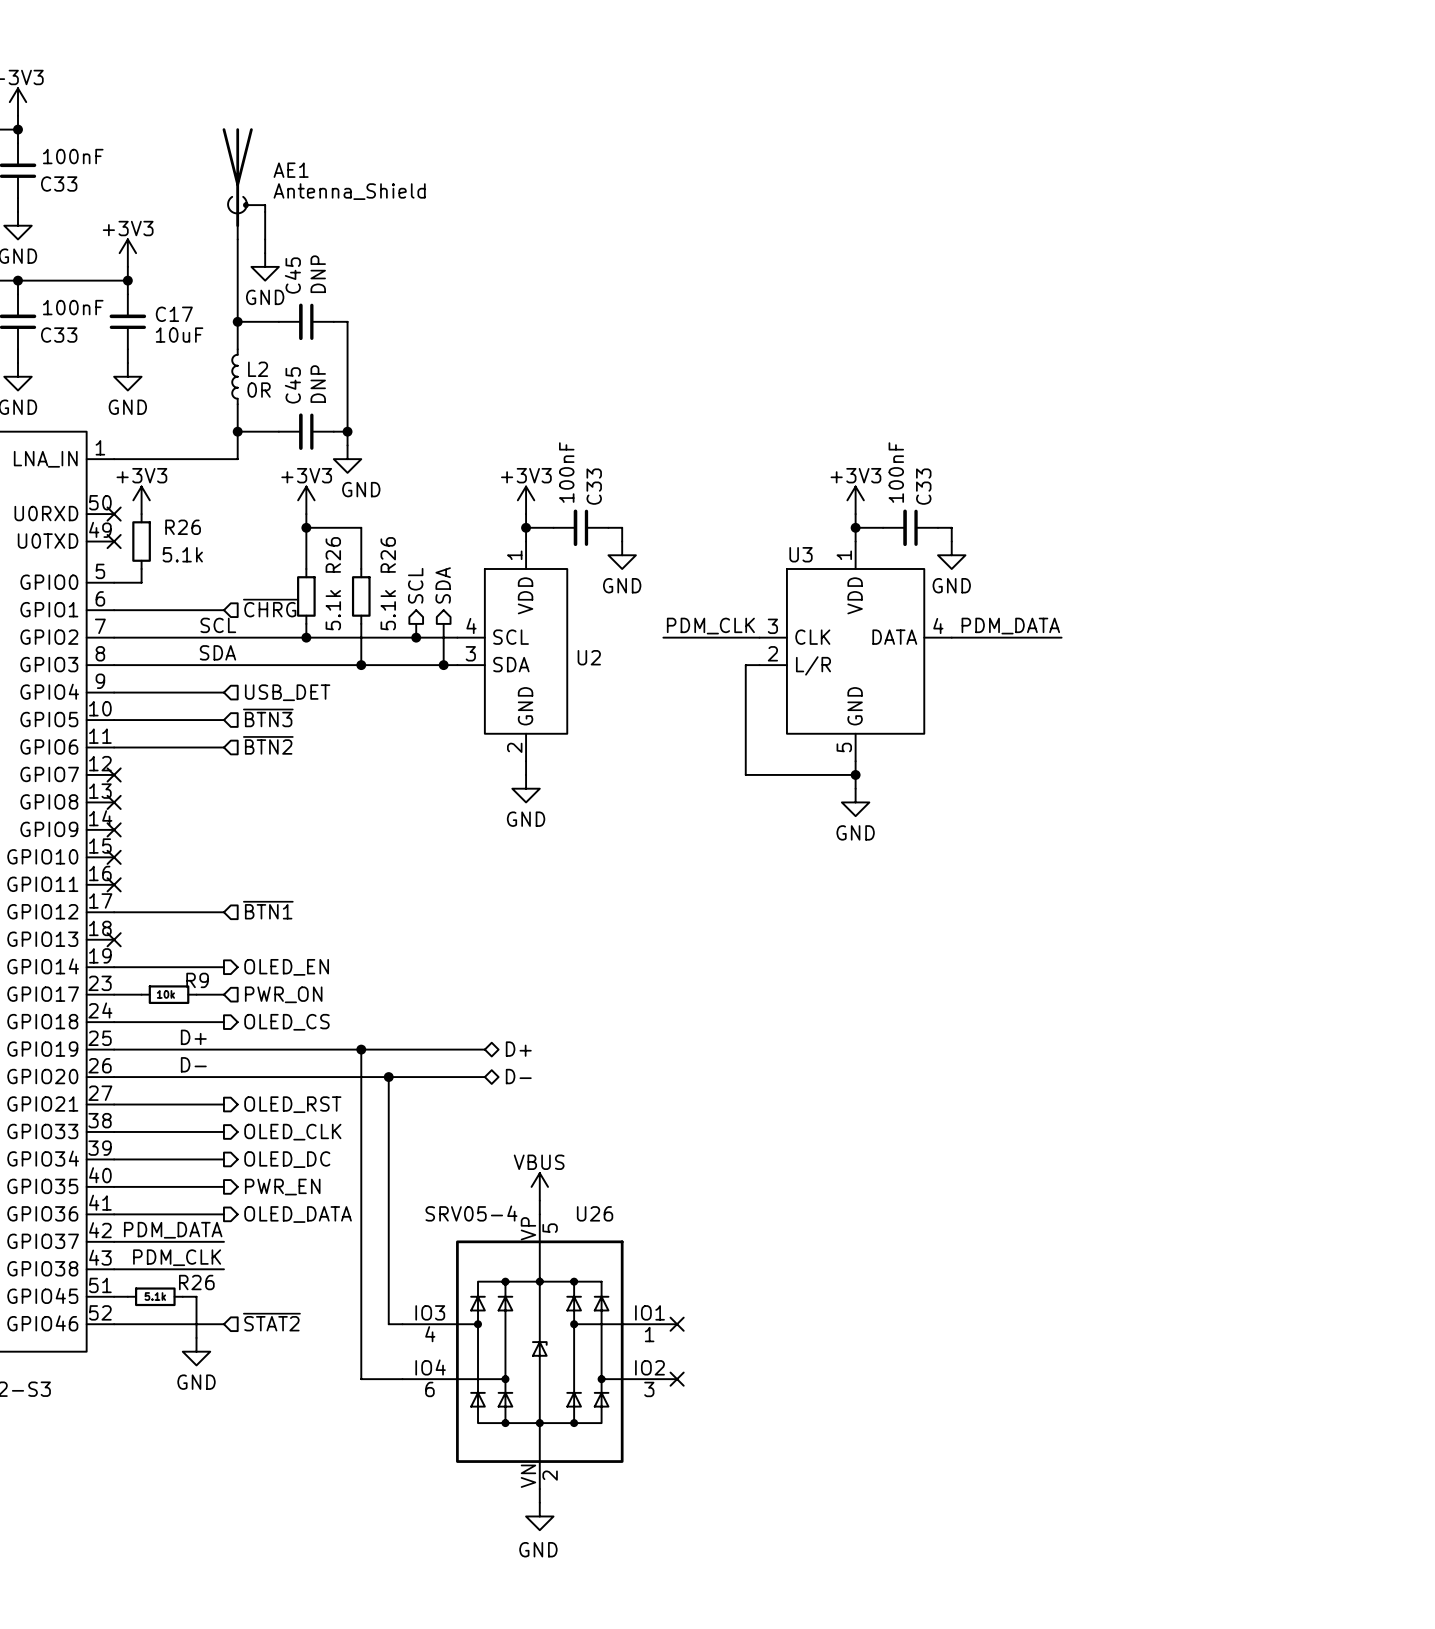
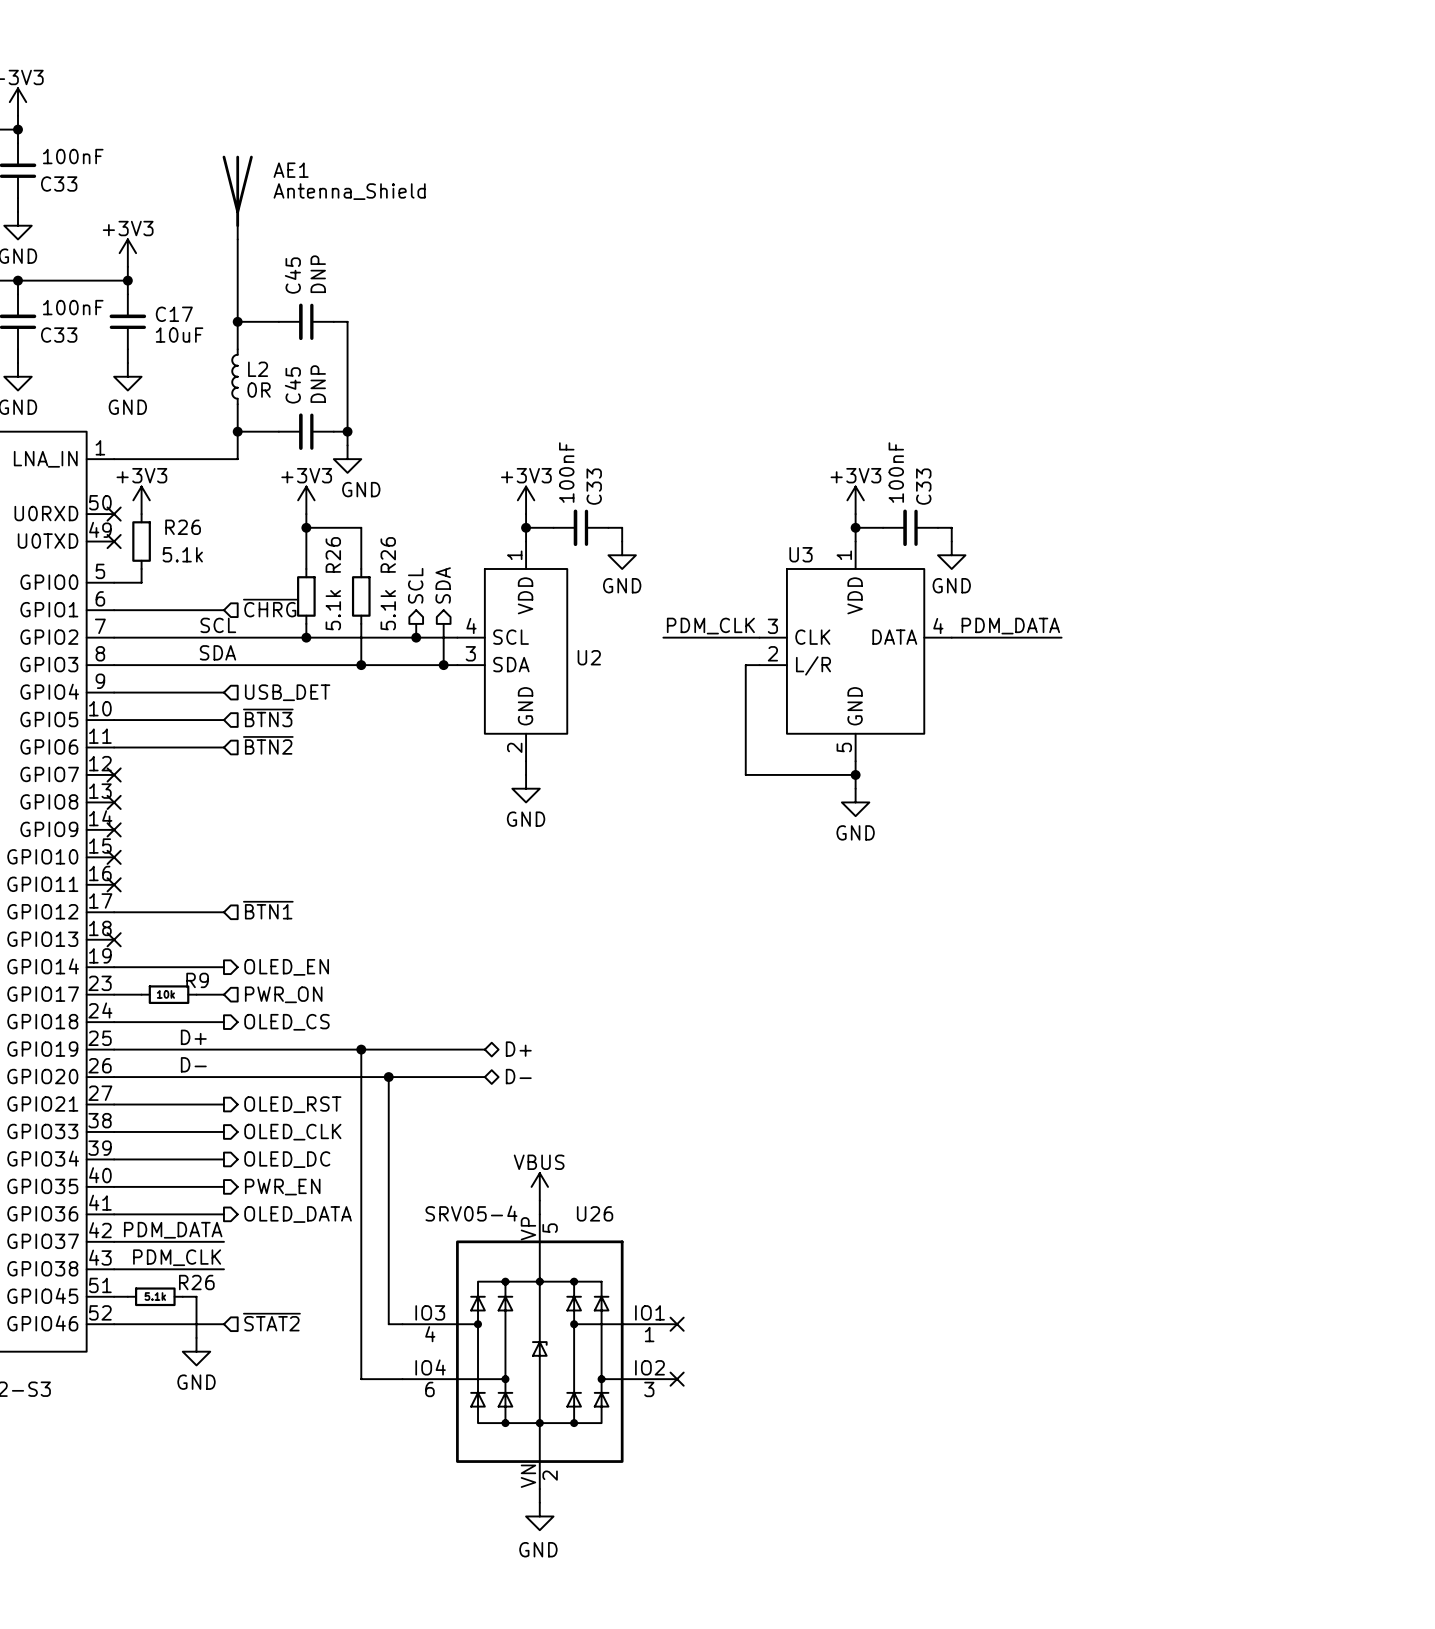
AE1 symbol: [222, 128, 266, 240] -> [222, 155, 253, 240]
wire: (265, 239) (265, 253) -> none
power symbol: GND (265, 266) -> none

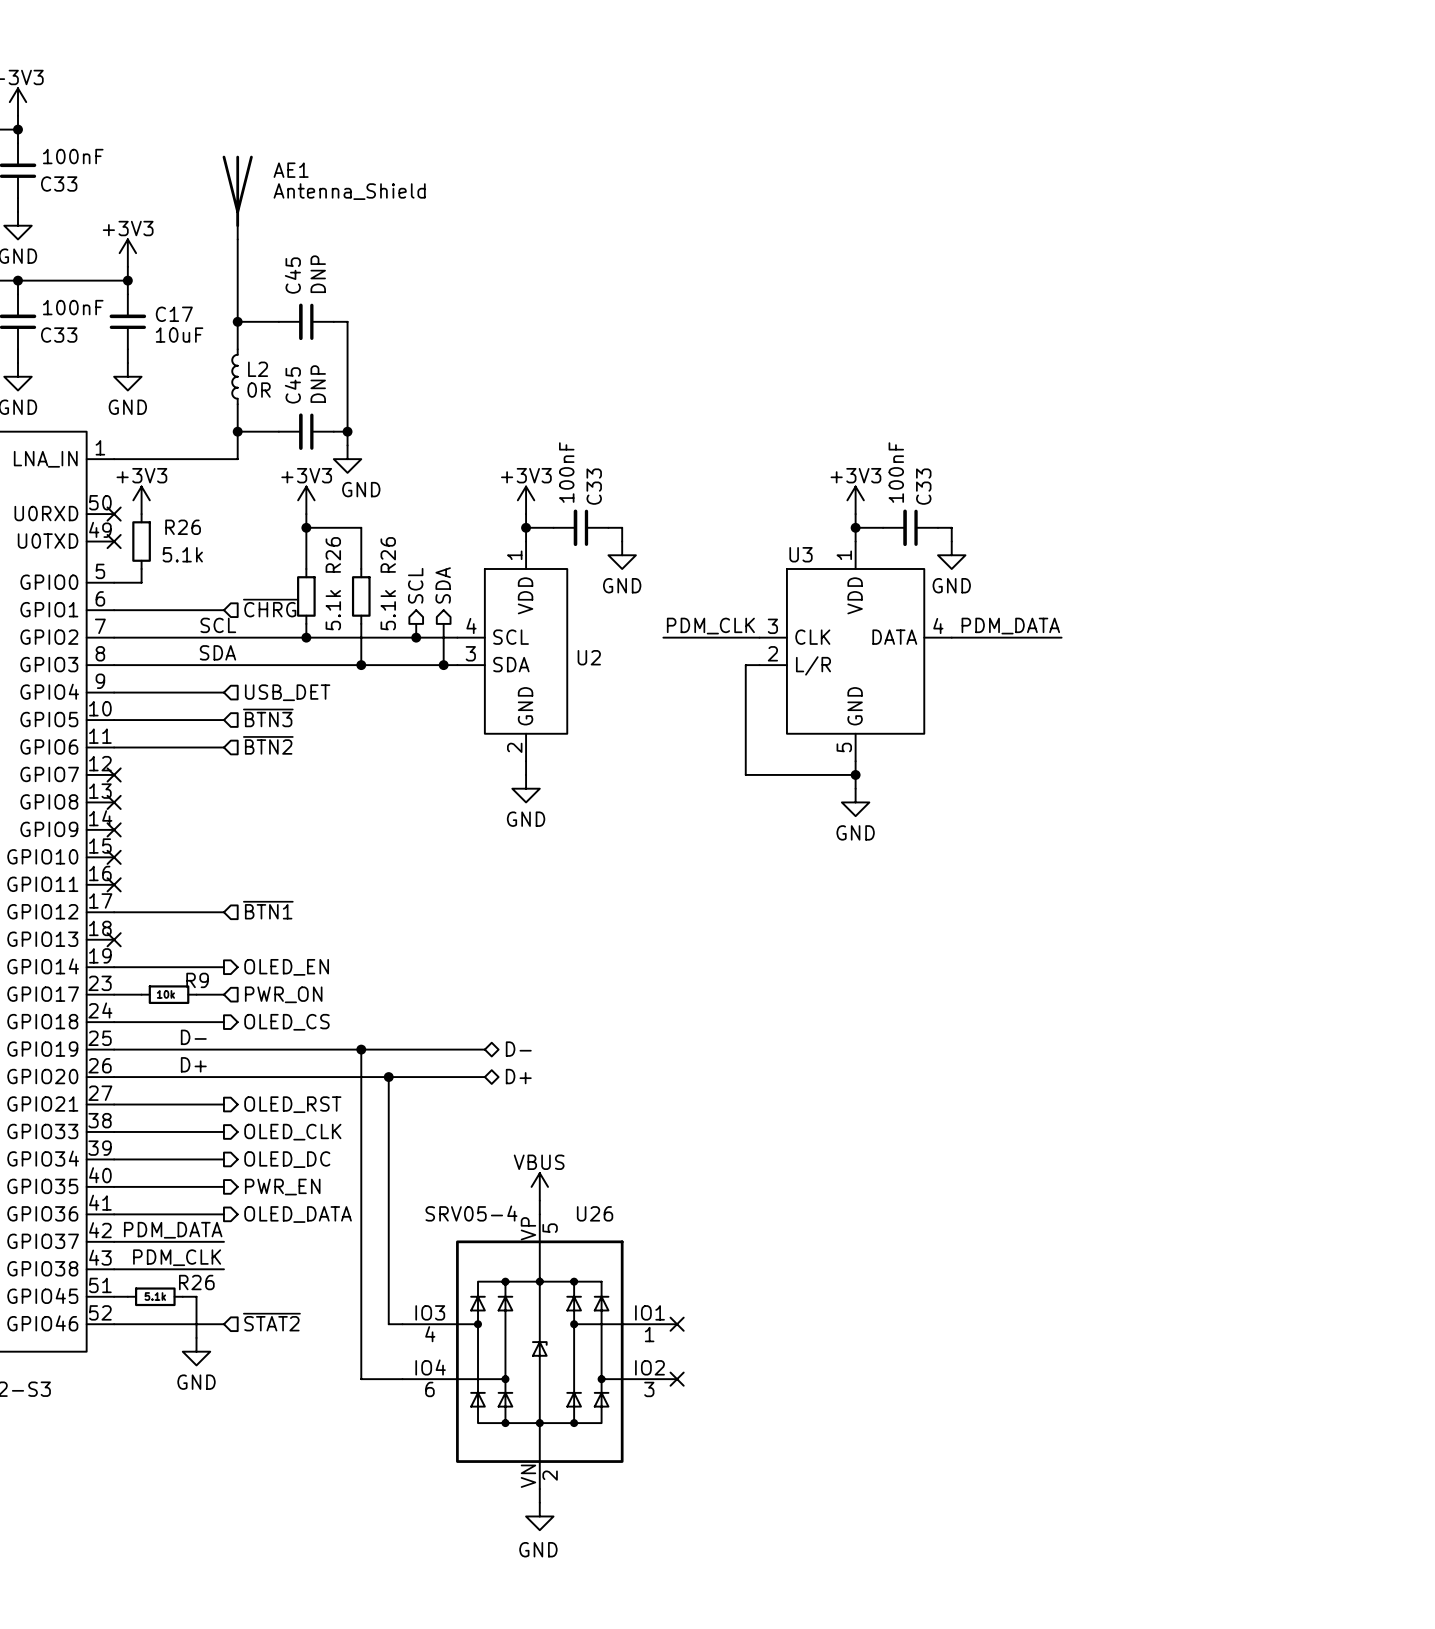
label: D+ (193, 1037) -> D- (193, 1037)
hierarchical label: D+ (518, 1049) -> D- (518, 1049)
label: D- (193, 1064) -> D+ (193, 1064)
hierarchical label: D- (518, 1076) -> D+ (518, 1076)

